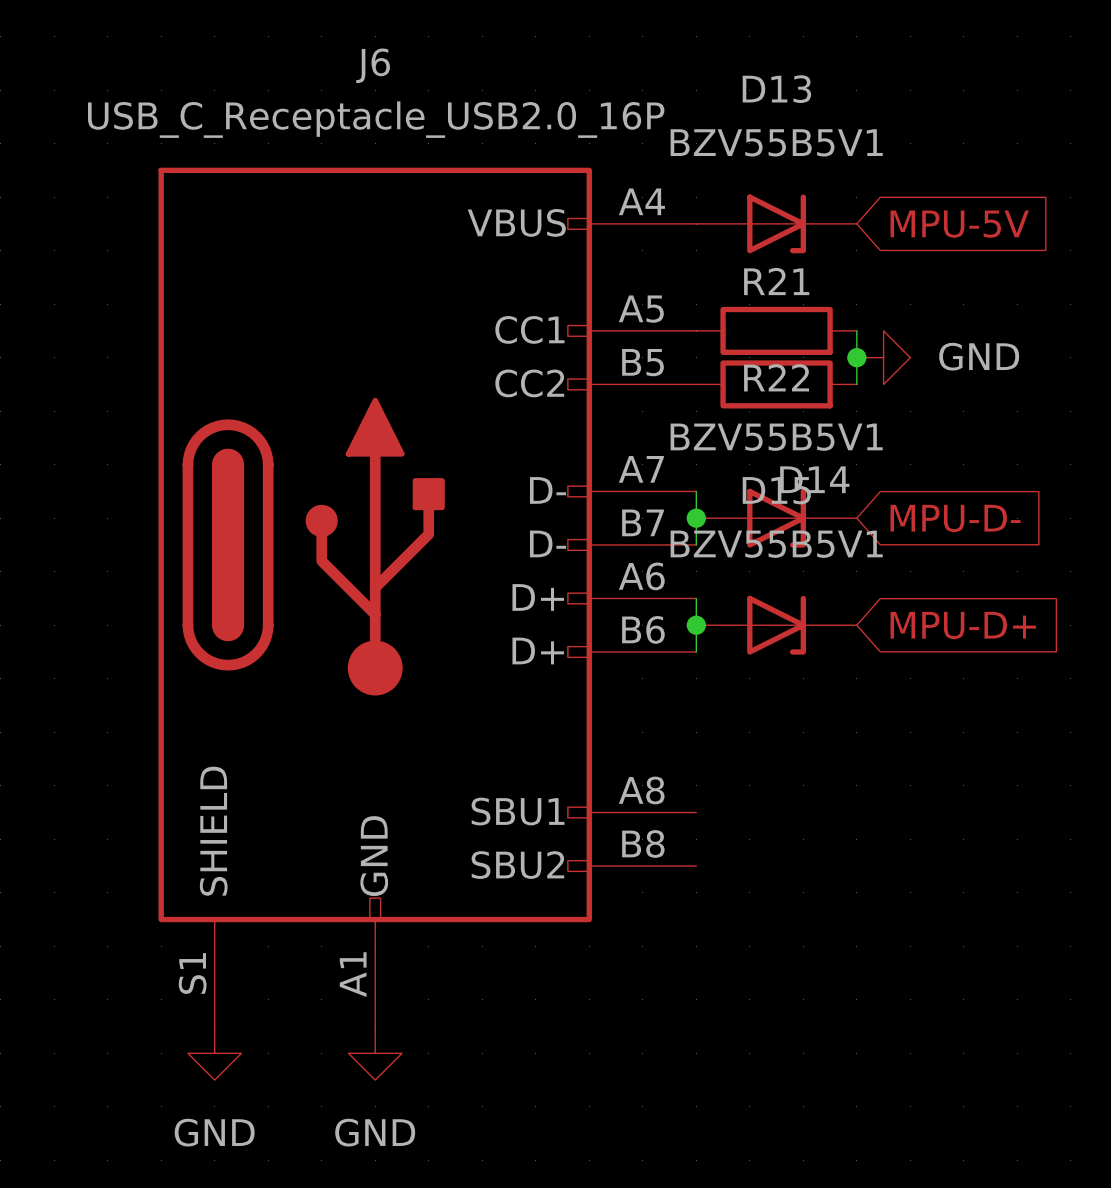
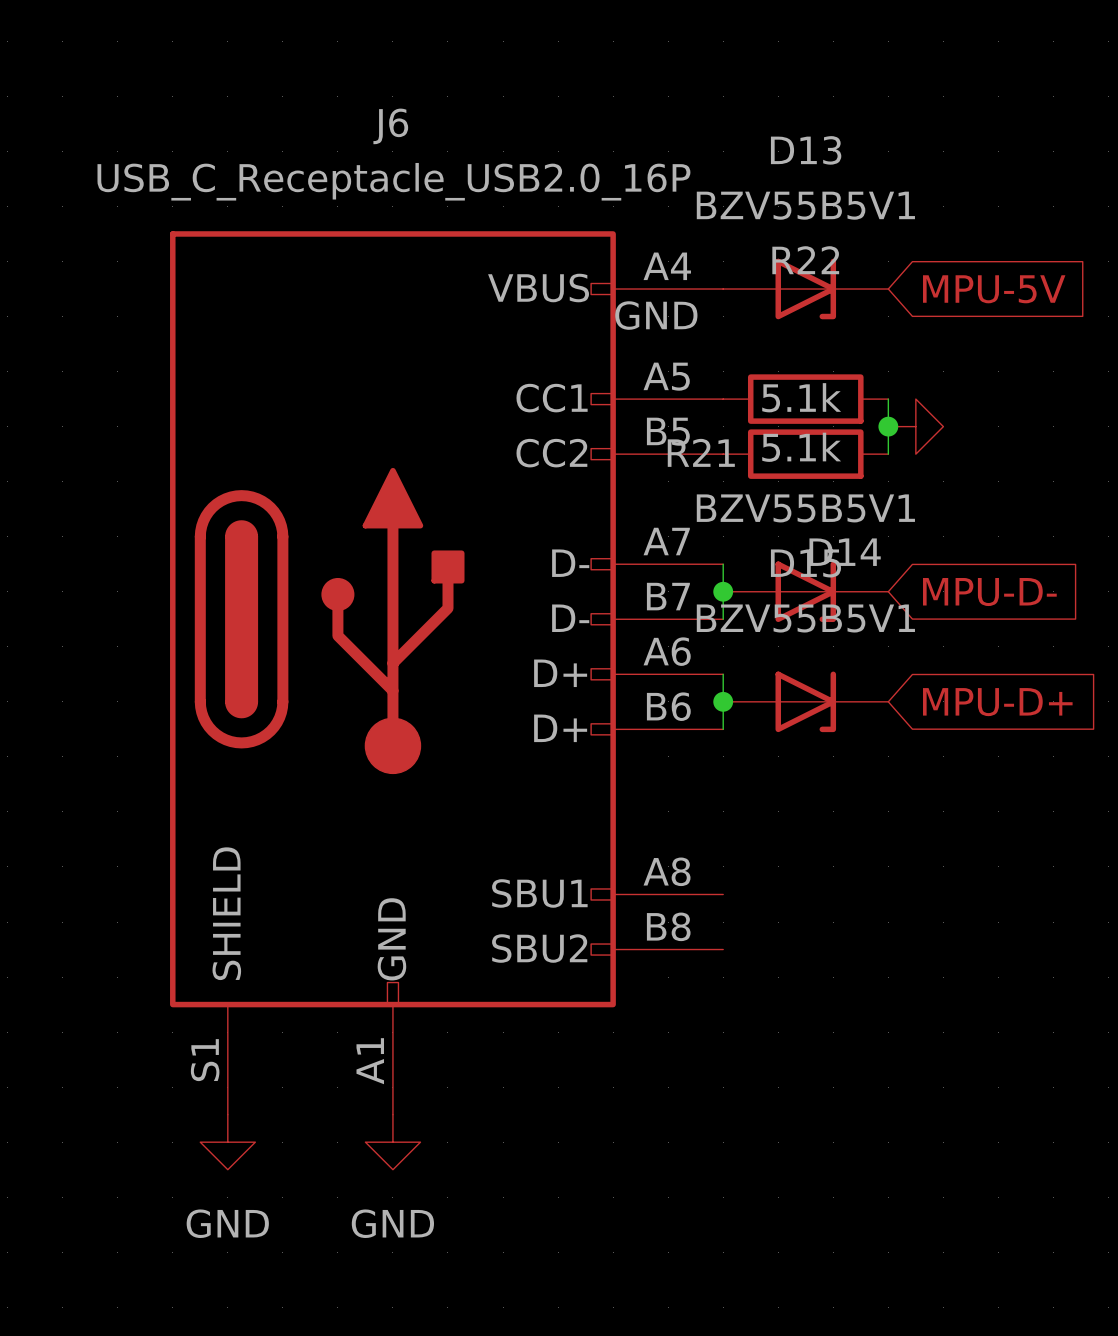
R21 name: R21 (776, 281) -> R22 (805, 260)
R21 value: none -> 5.1k (801, 397)
power symbol text position: GND (979, 356) -> GND (656, 315)
R22 value: none -> 5.1k (801, 447)
R22 name: R22 (776, 377) -> R21 (701, 452)

